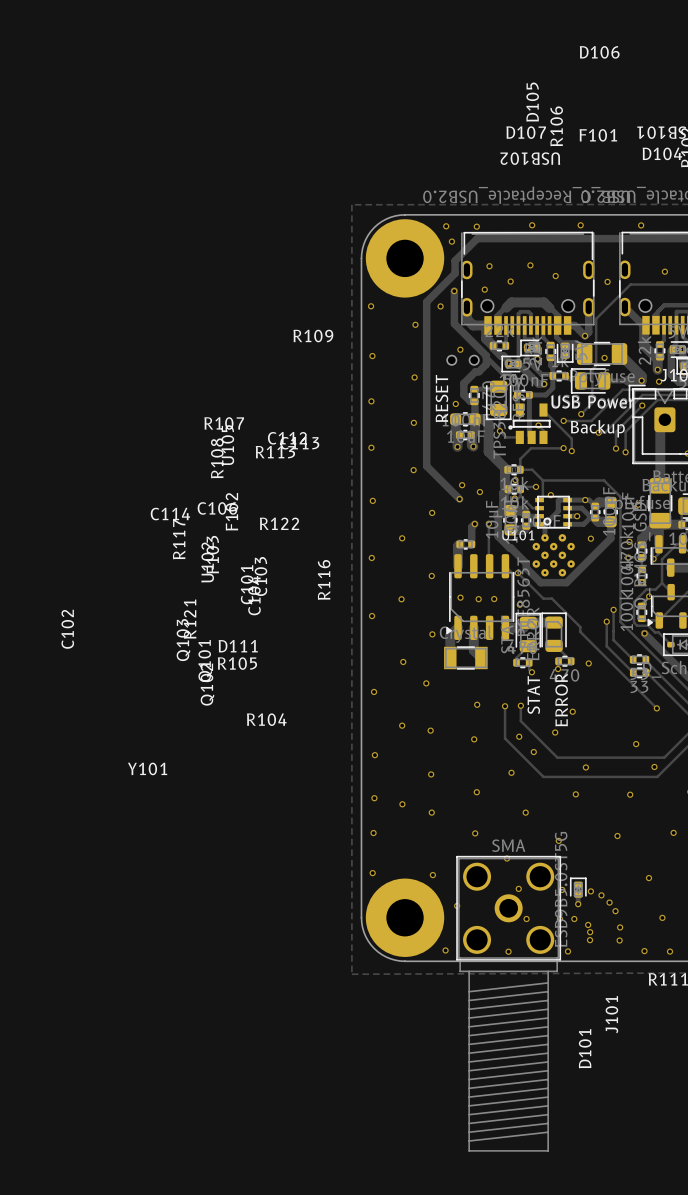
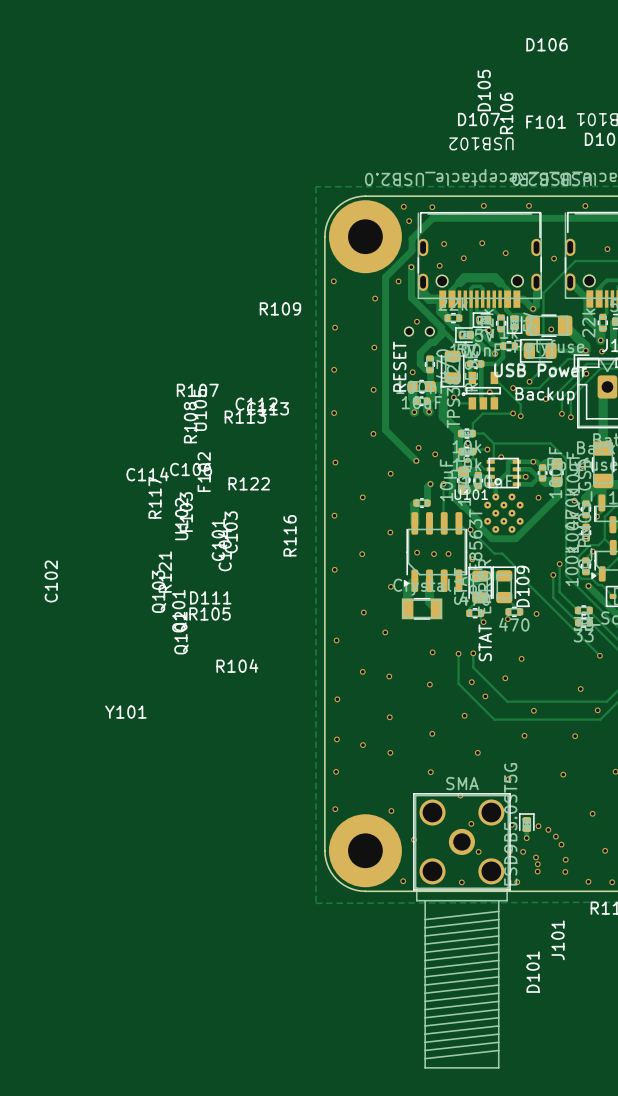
ERROR name: ERROR (561, 699) -> D109 (522, 586)

